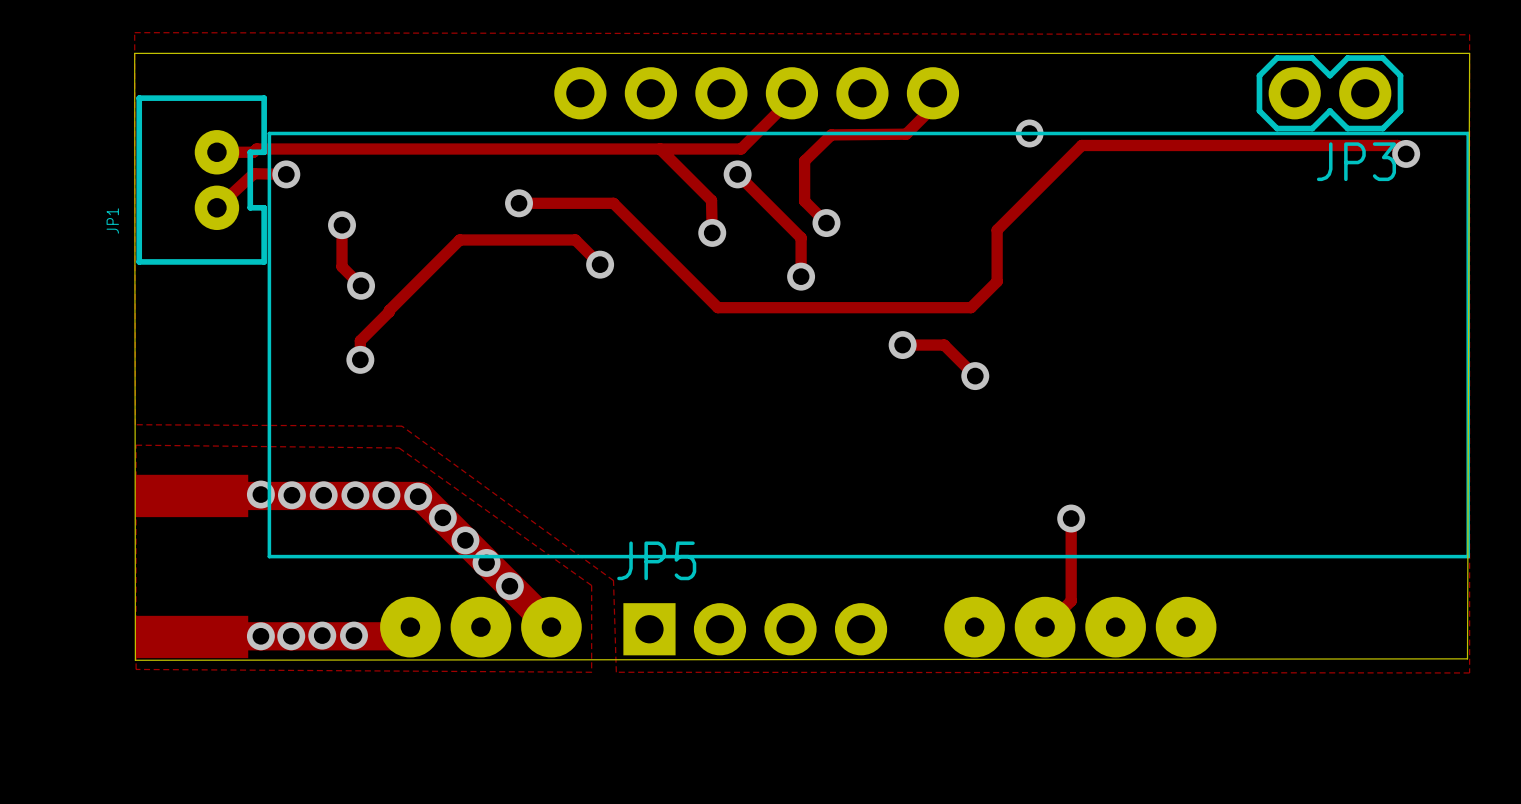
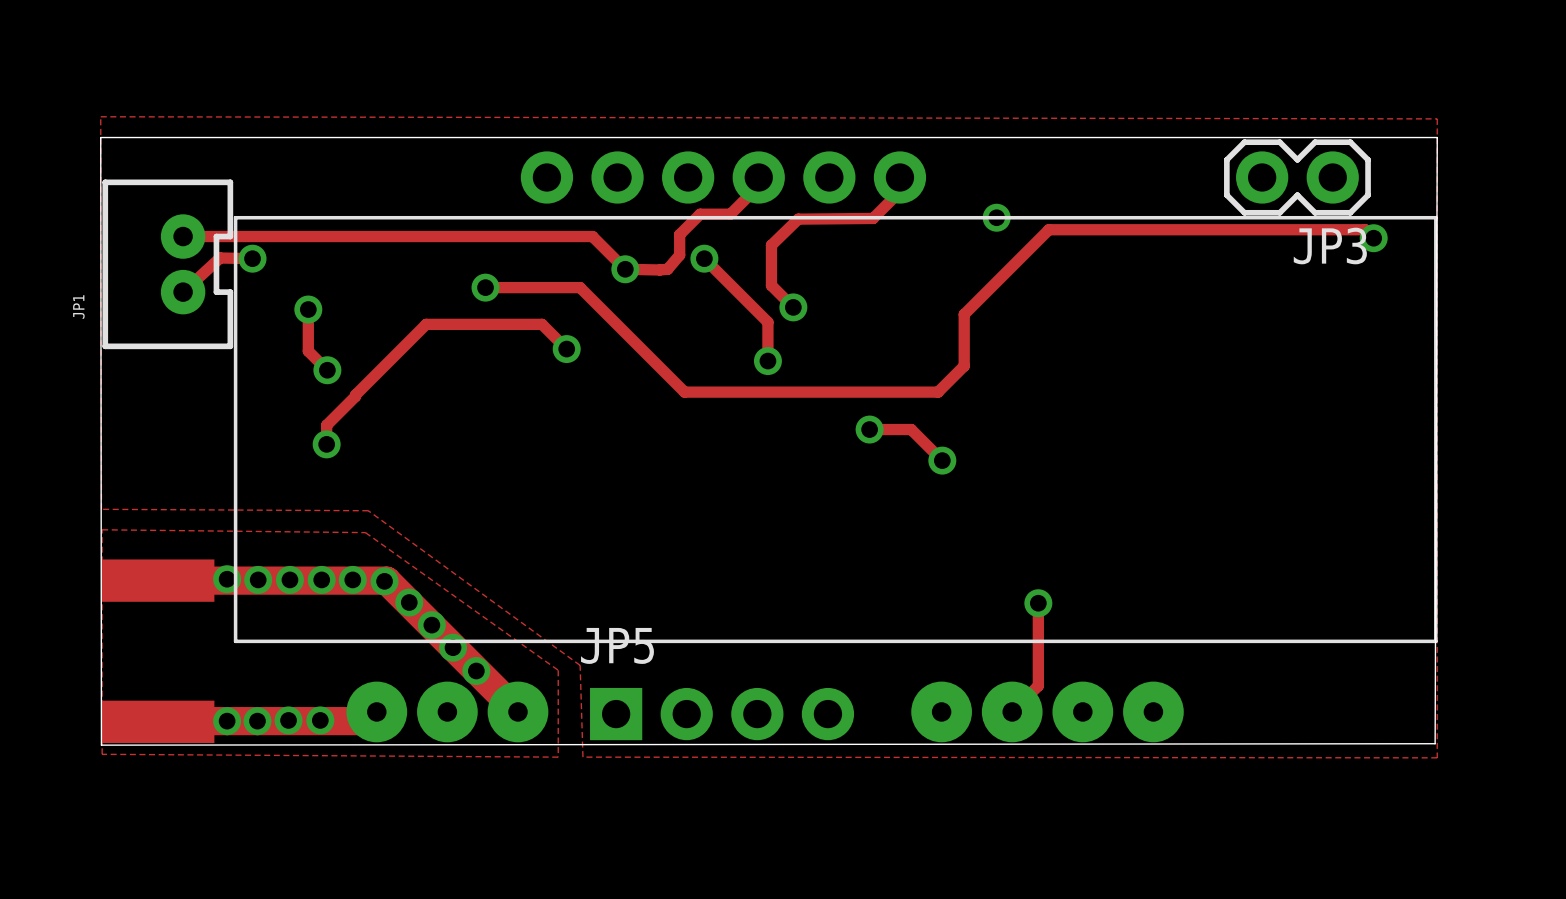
track: (791, 98) (741, 149) (256, 149) (253, 152) -> (758, 177) (758, 185) (730, 214) (700, 214) (679, 234) (679, 255) (667, 269) (625, 269) (592, 236) (219, 236)
track: (660, 149) (711, 200) (712, 232) -> none
via position: (712, 232) -> (625, 269)

